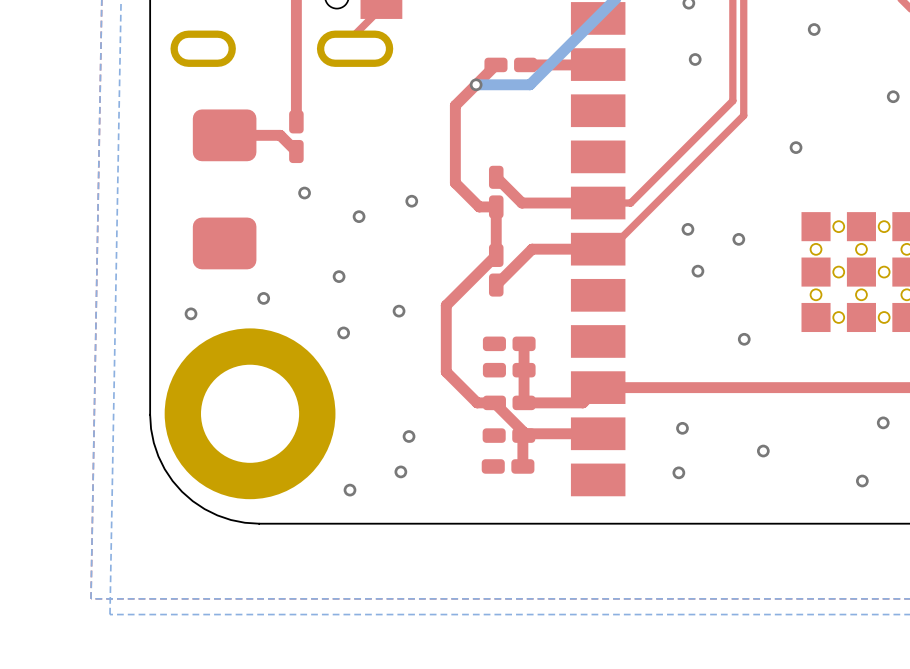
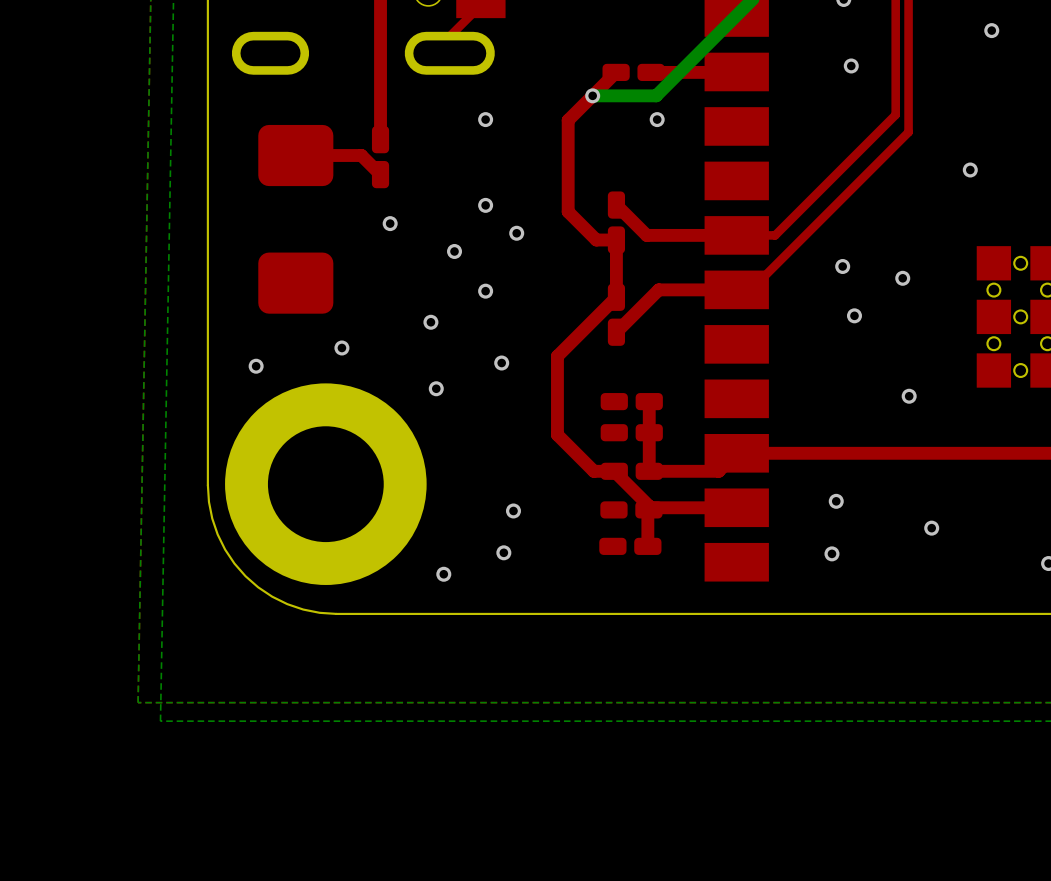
via: none -> (485, 119)
via: none -> (657, 119)
via: none -> (485, 205)
via: none -> (485, 291)

